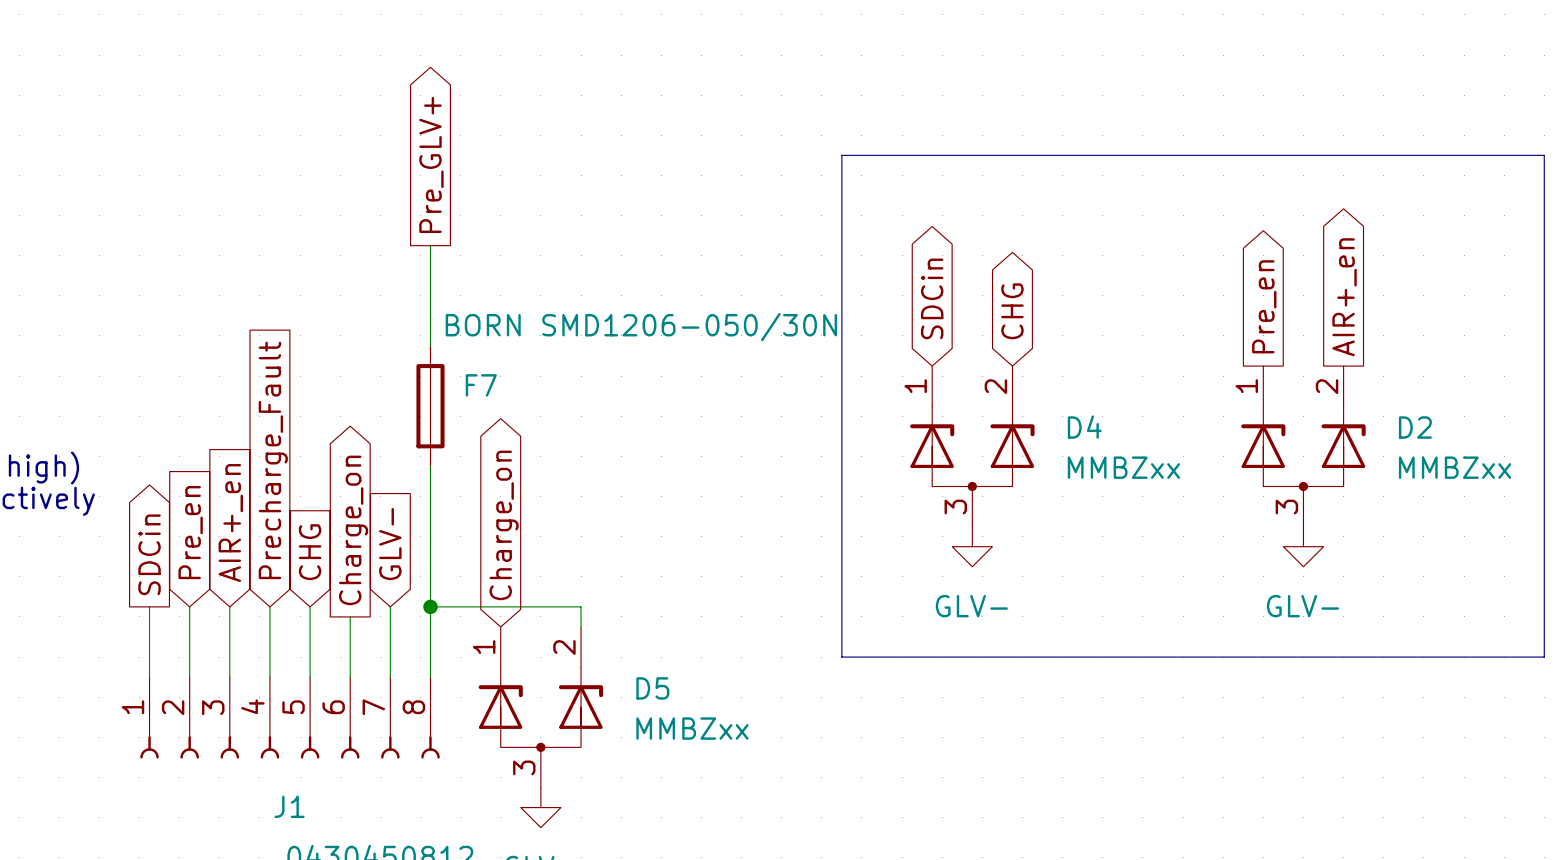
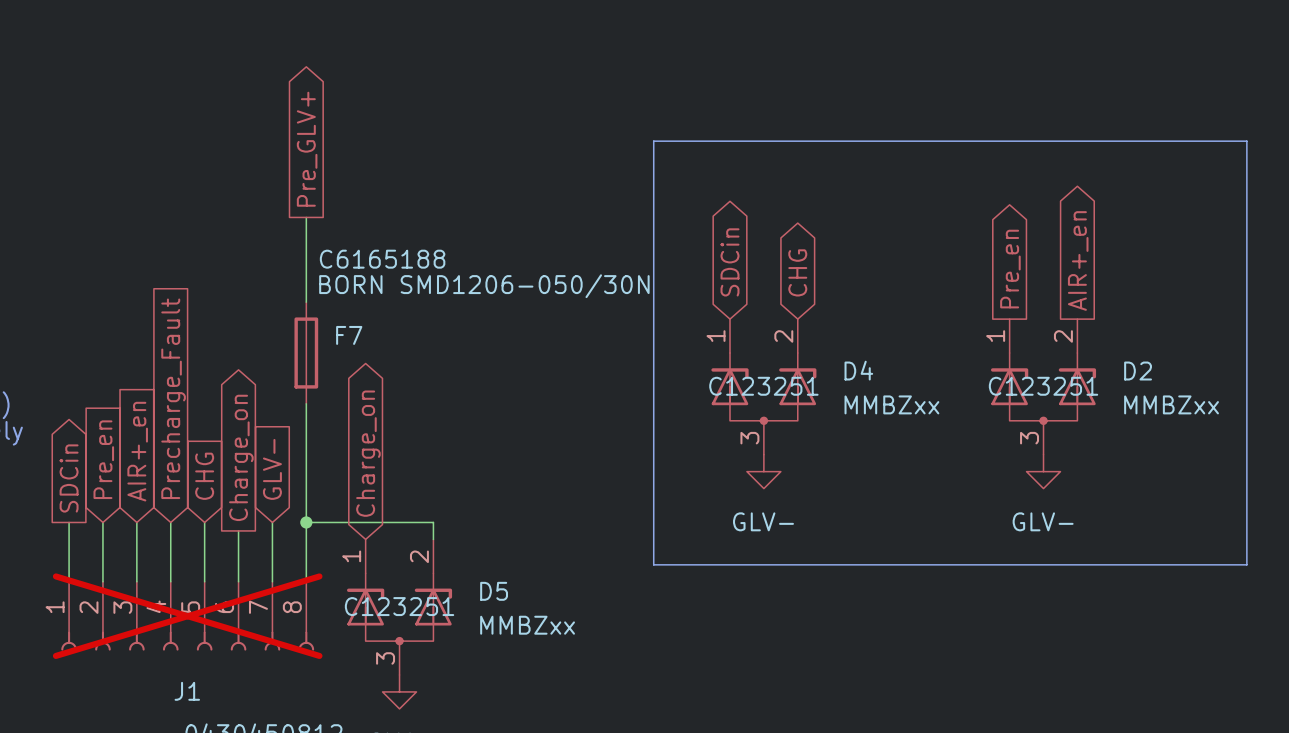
F7 text: none -> C6165188 (382, 259)
D4 text: none -> C123251 (763, 386)
D2 text: none -> C123251 (1043, 386)
D5 text: none -> C123251 (399, 606)
J1 do-not-place cross: none -> (187, 616)

